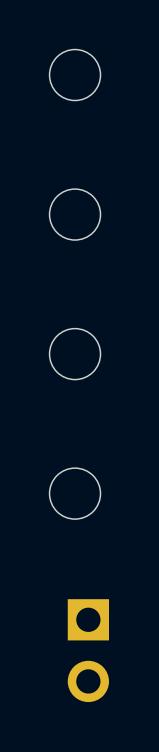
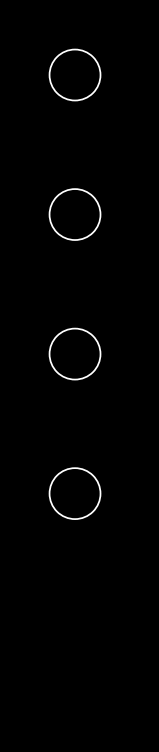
part: (88, 650) -> none

